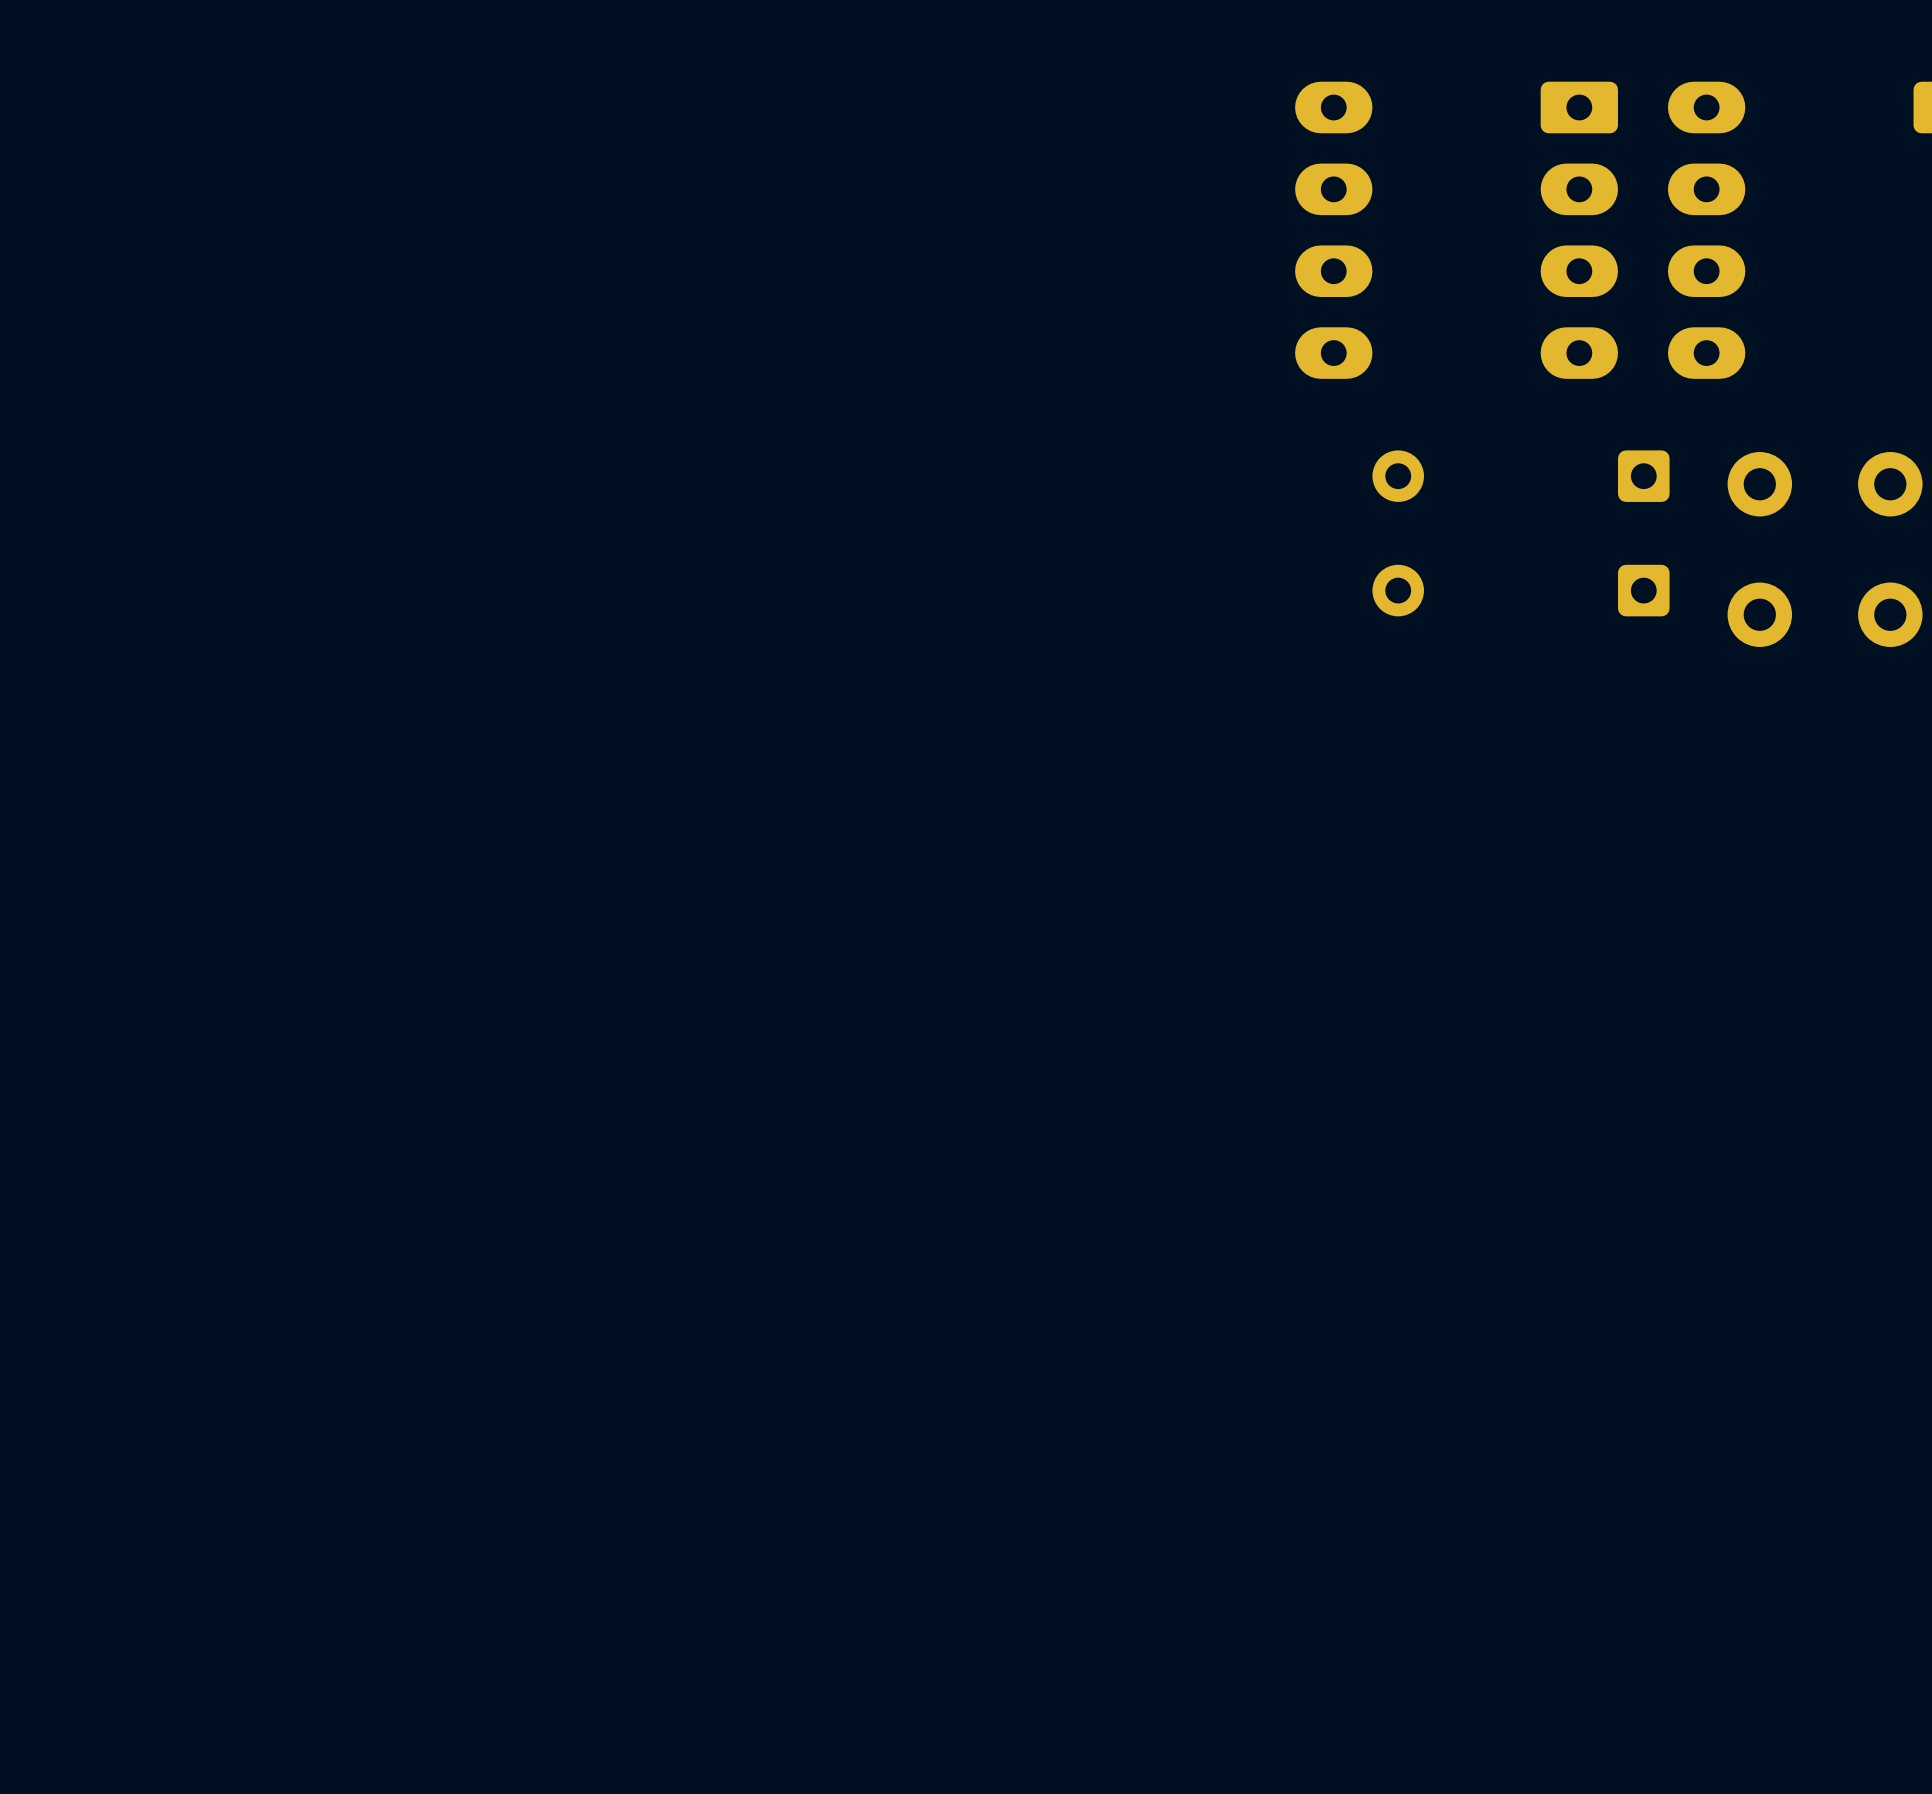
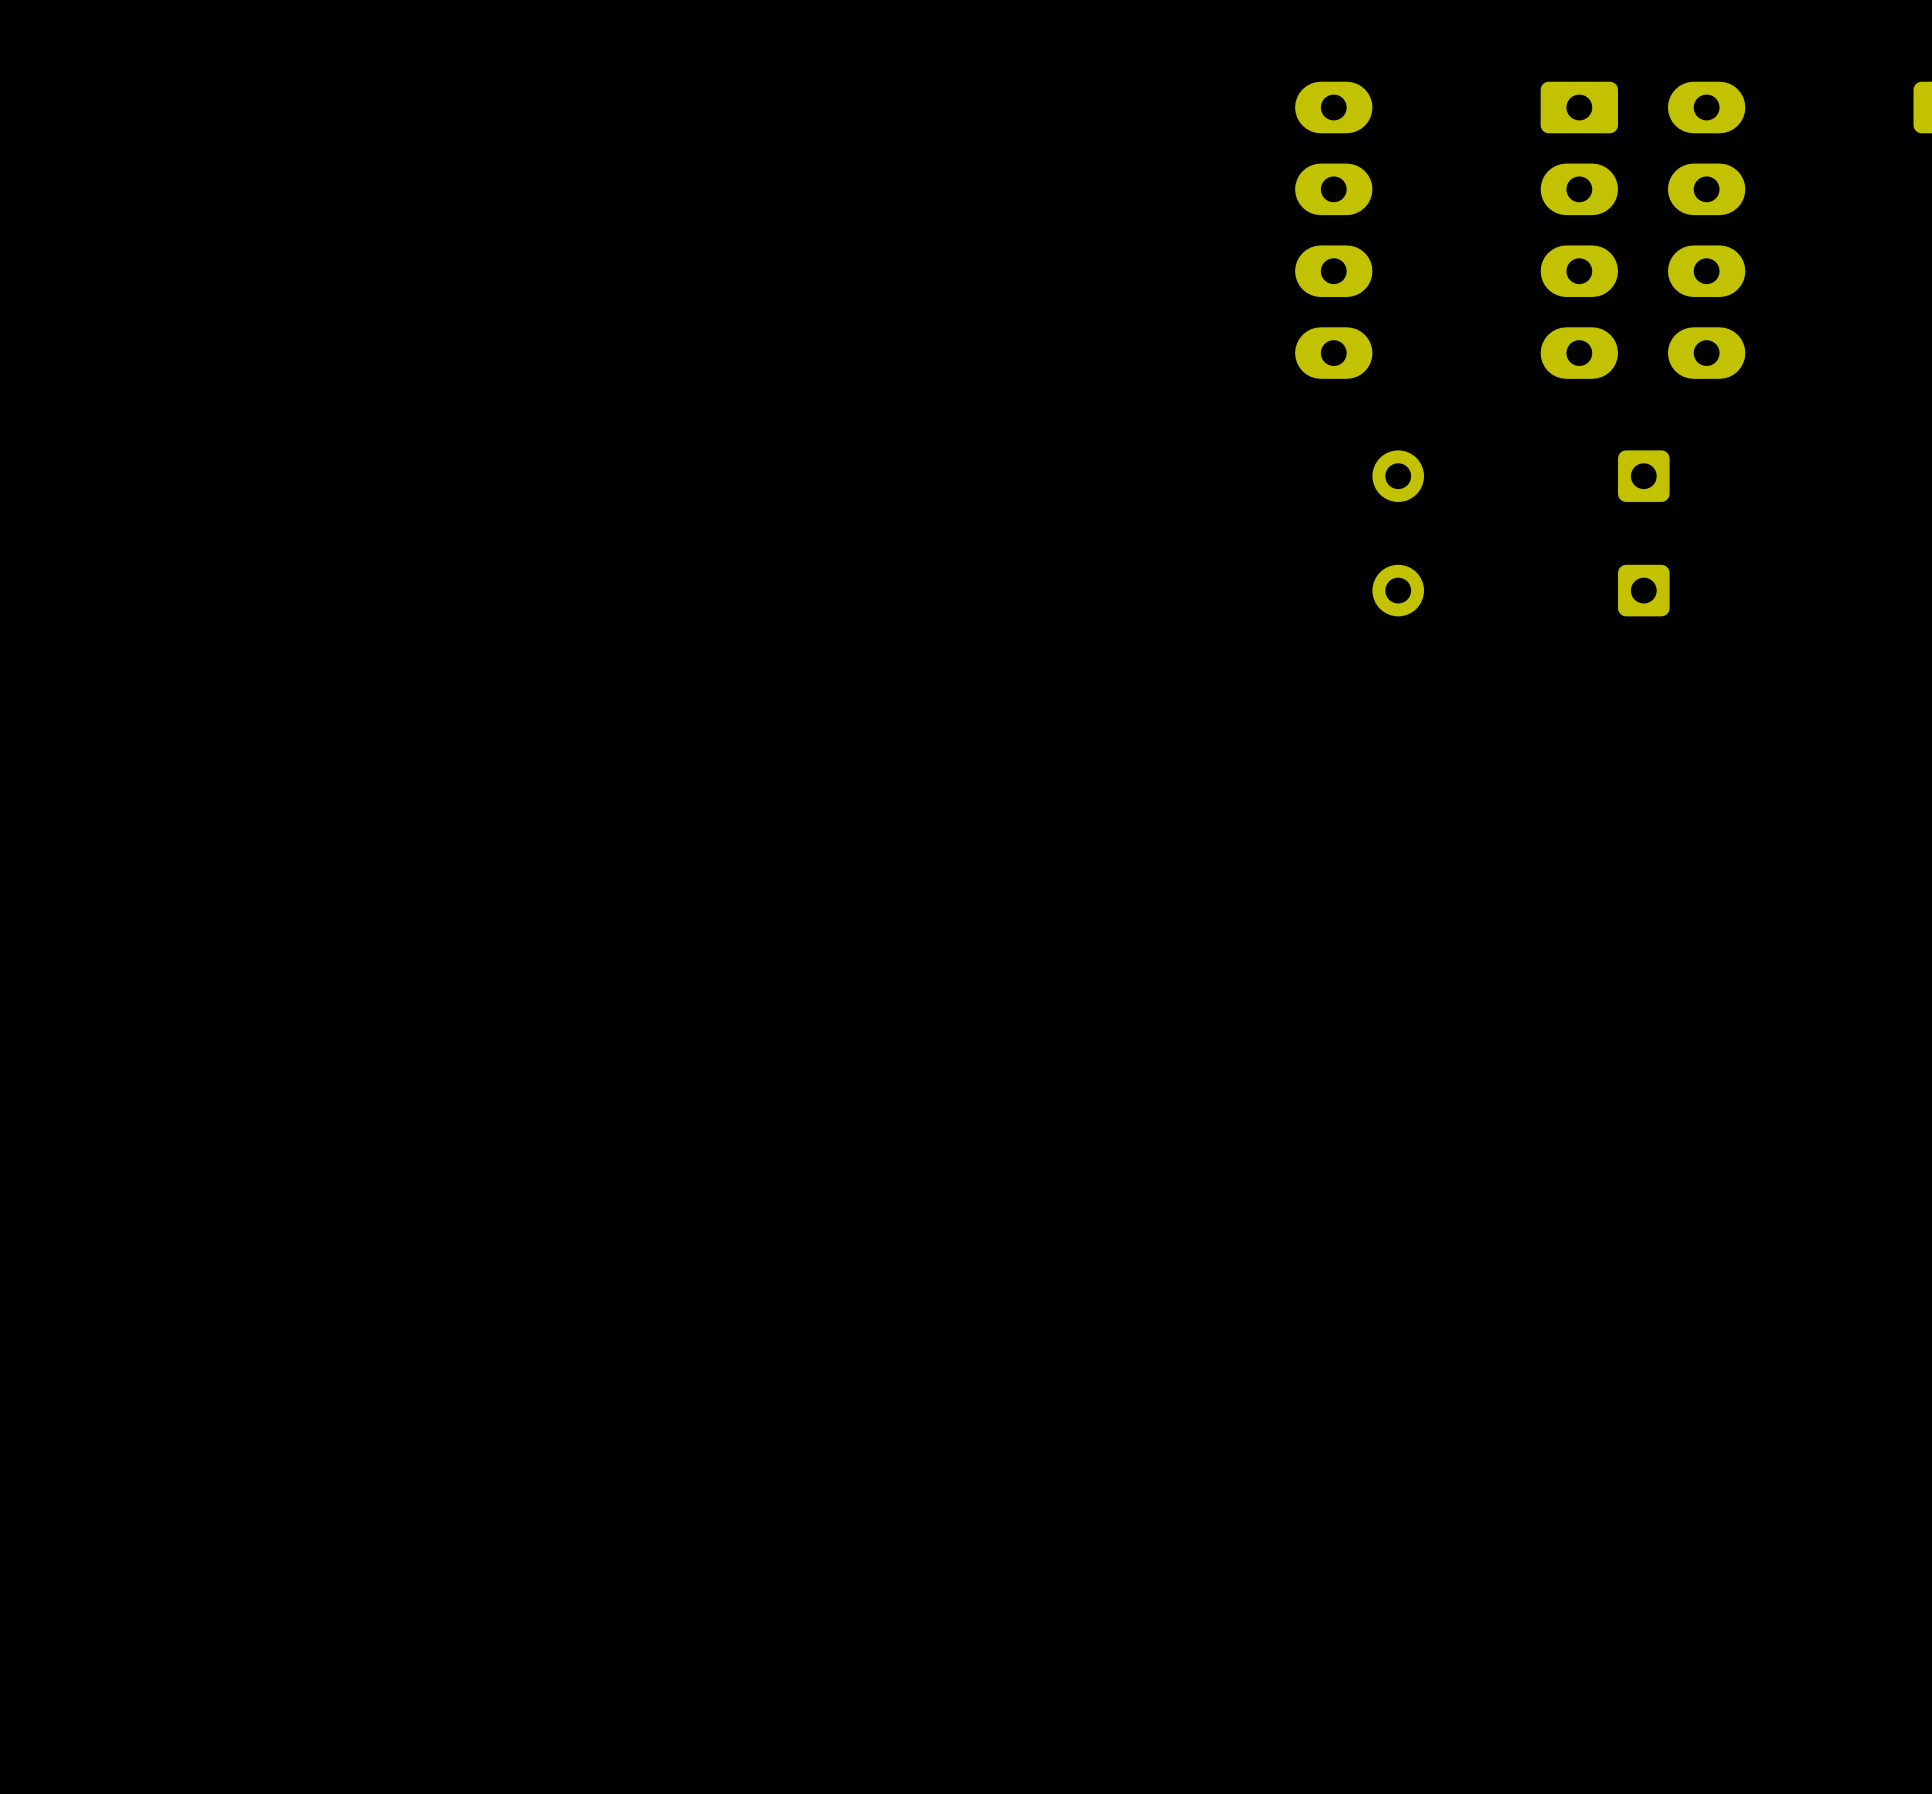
part: (1759, 484) -> none
part: (1890, 484) -> none
part: (1759, 614) -> none
part: (1890, 614) -> none

